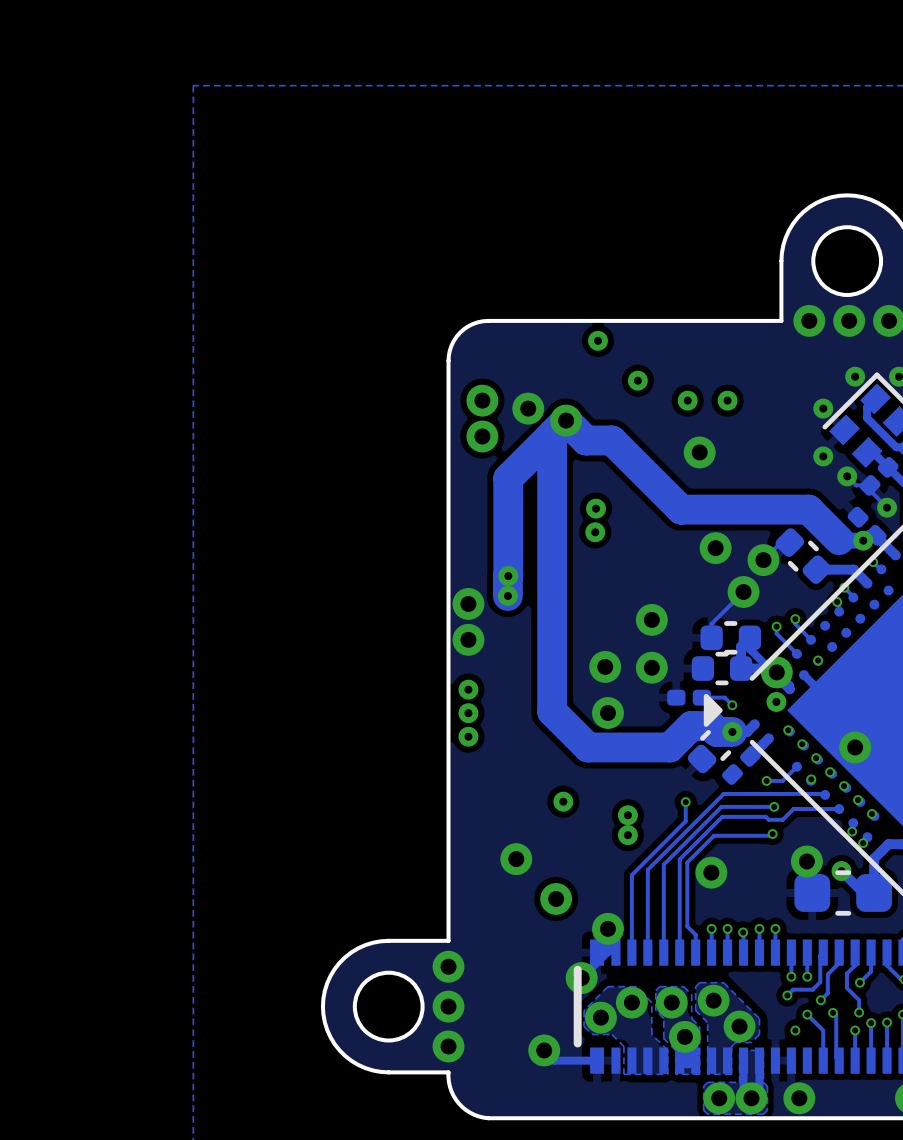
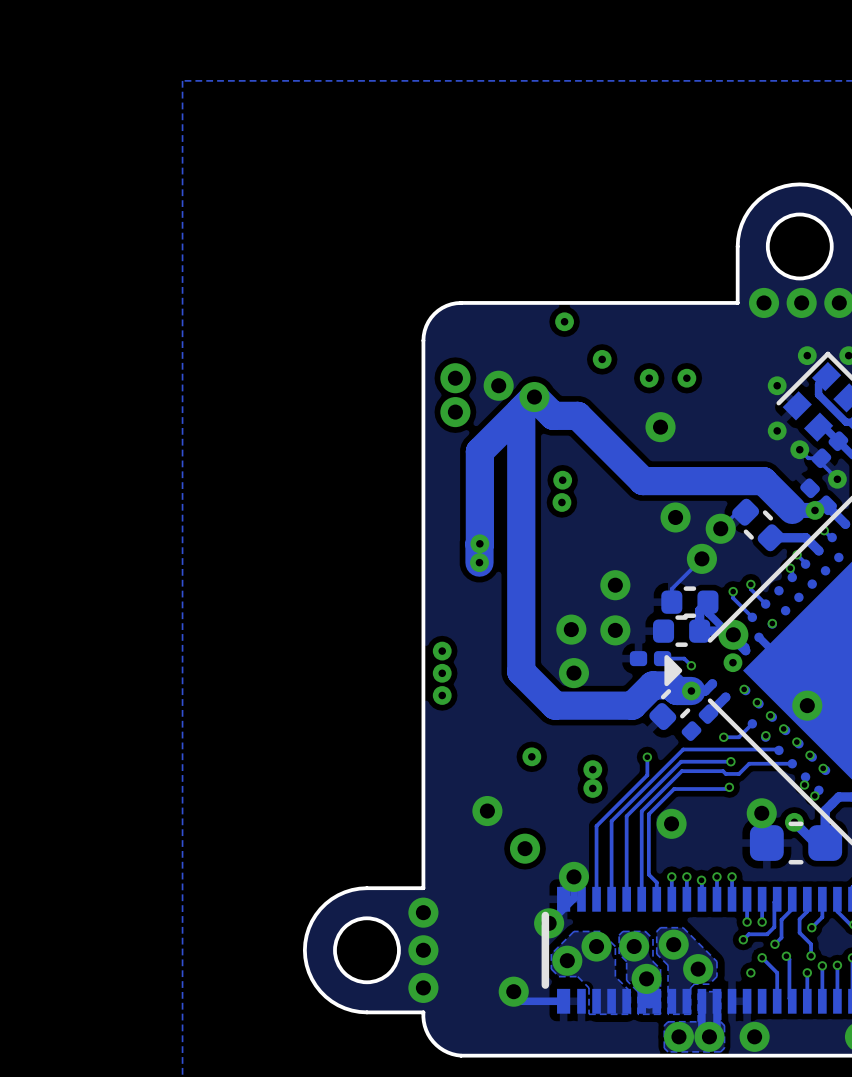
via: (468, 603) -> none
via: (468, 639) -> none

